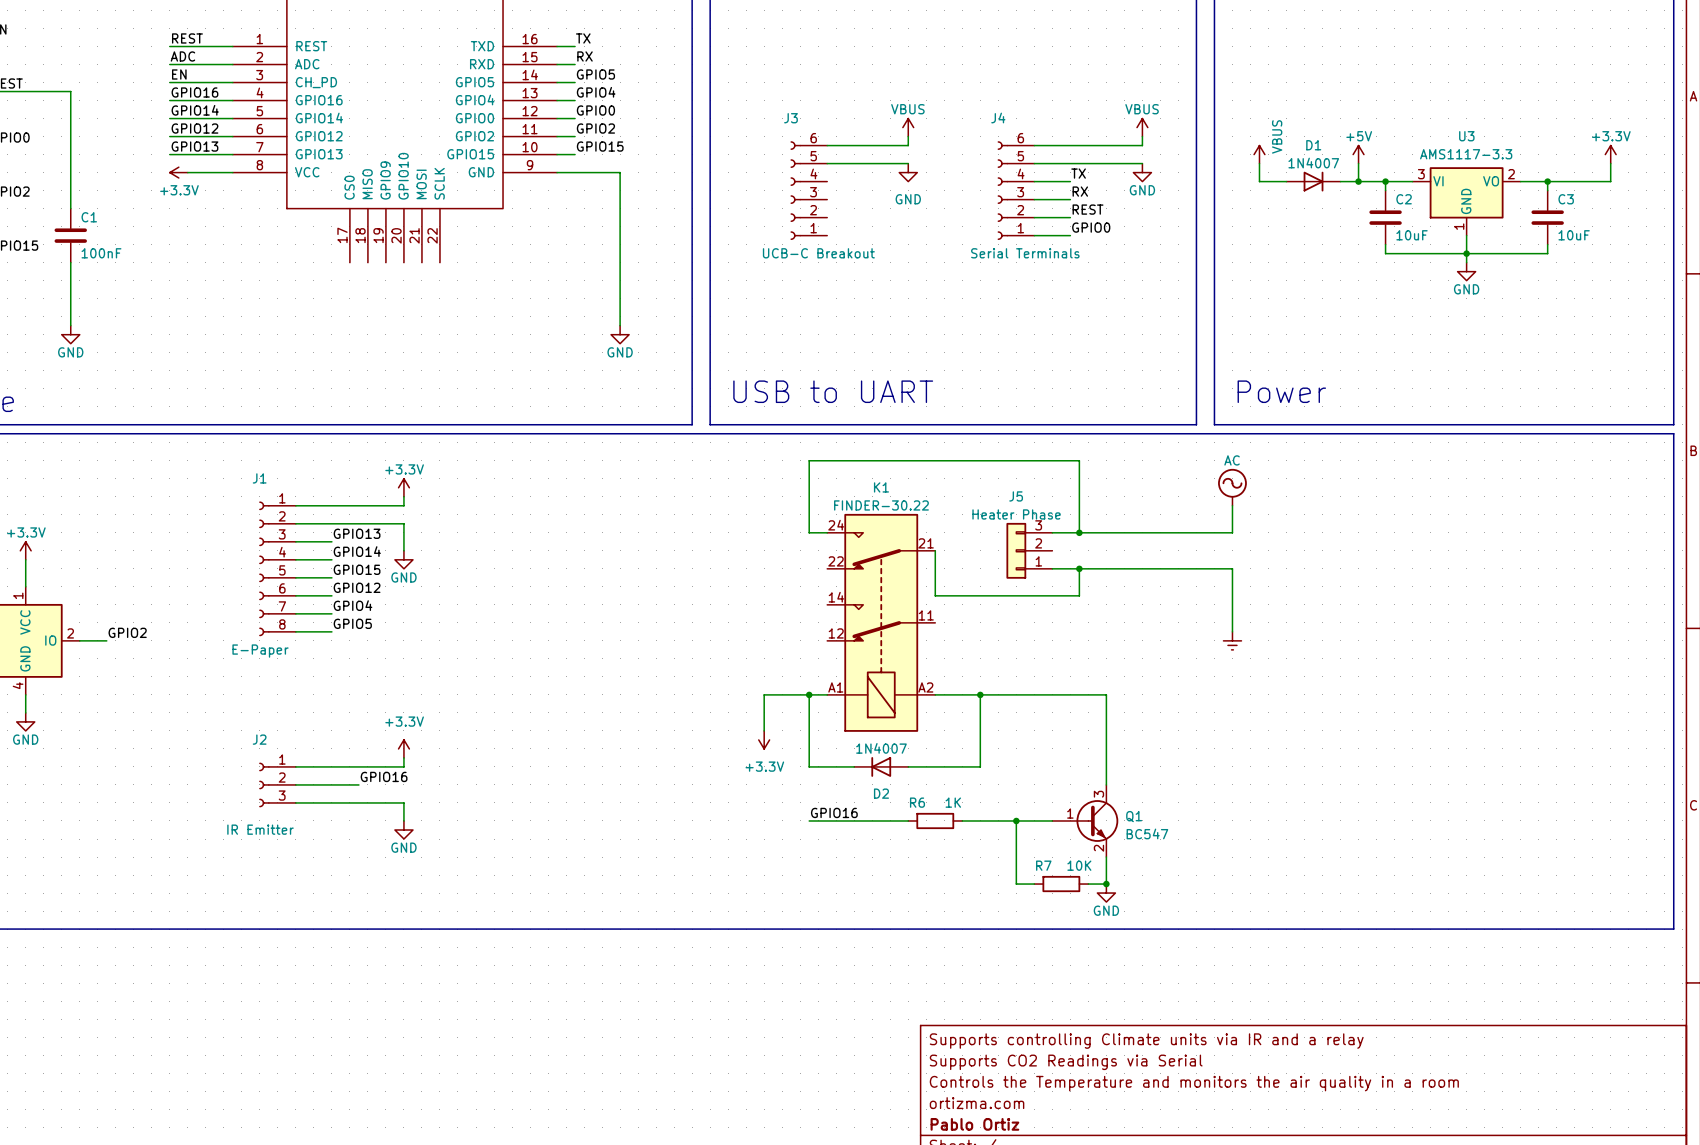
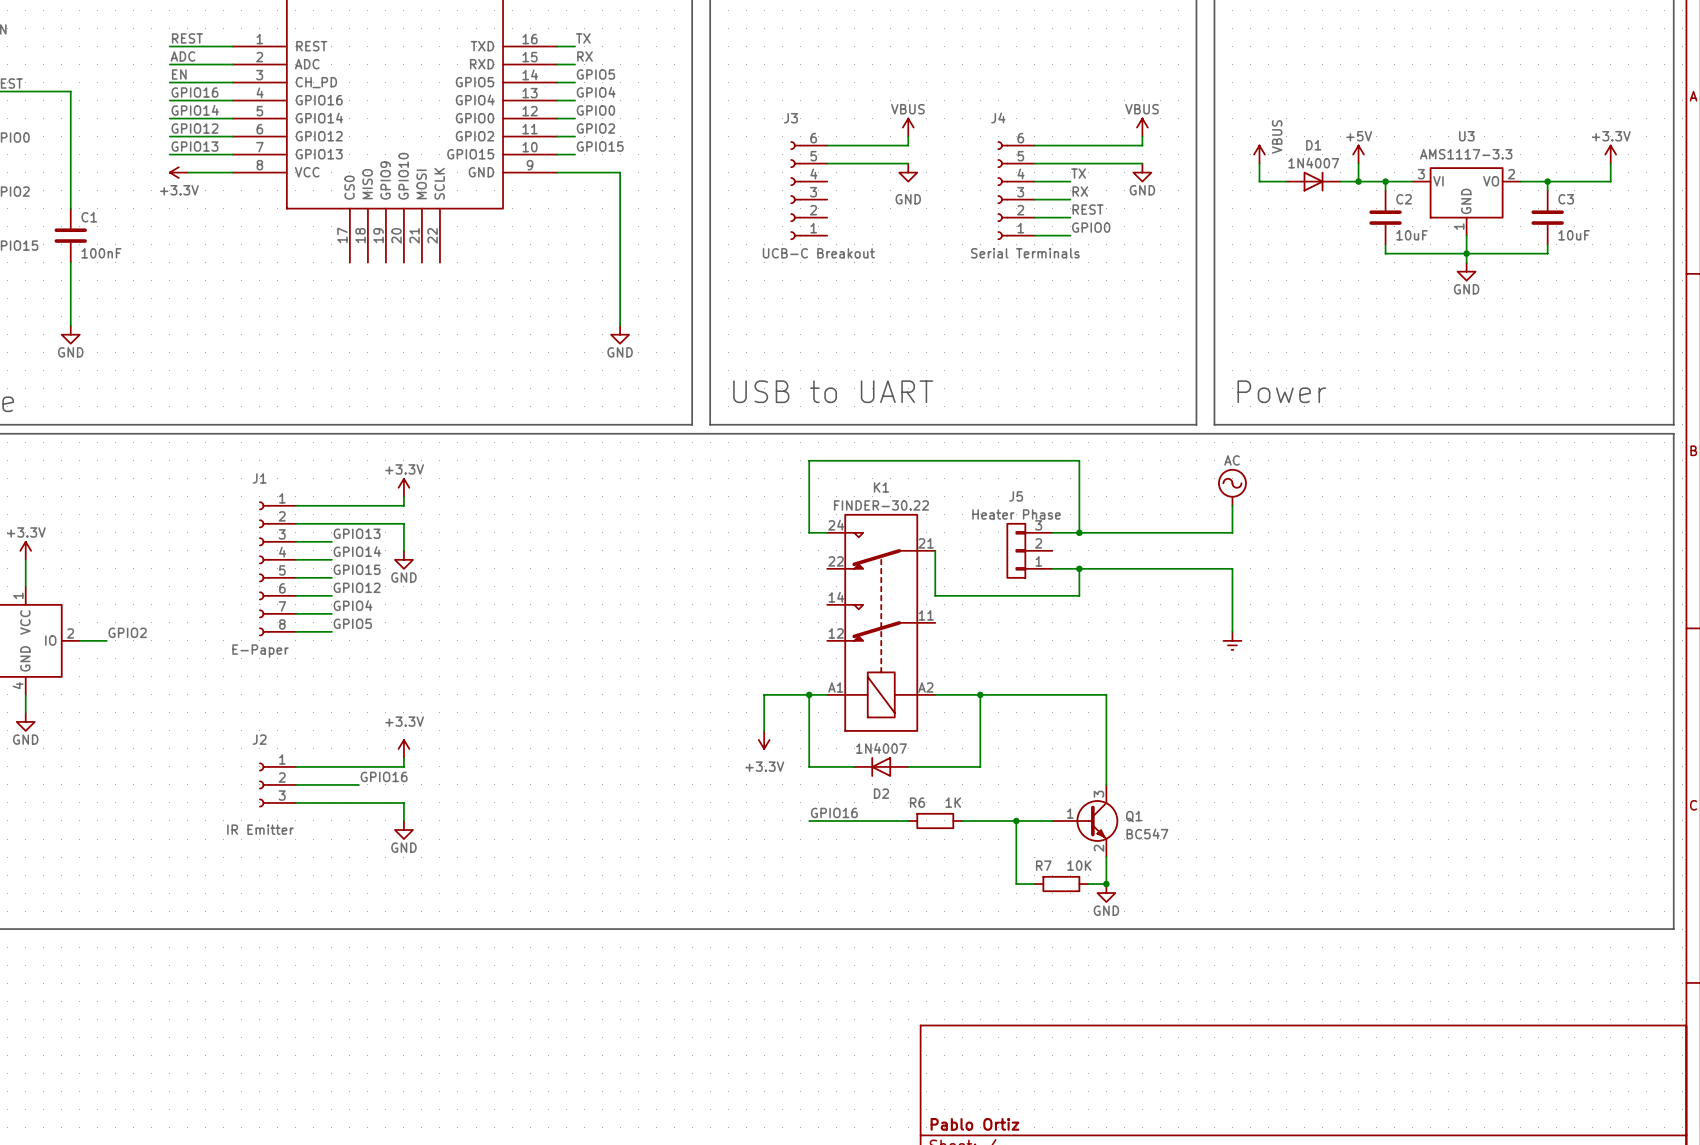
title block: Supports controlling Climate units via IR and a relay (1146, 1041) -> none
title block: Supports CO2 Readings via Serial (1066, 1062) -> none
title block: Controls the Temperature and monitors the air quality in a room (1194, 1083) -> none
title block: ortizma.com (977, 1103) -> none

